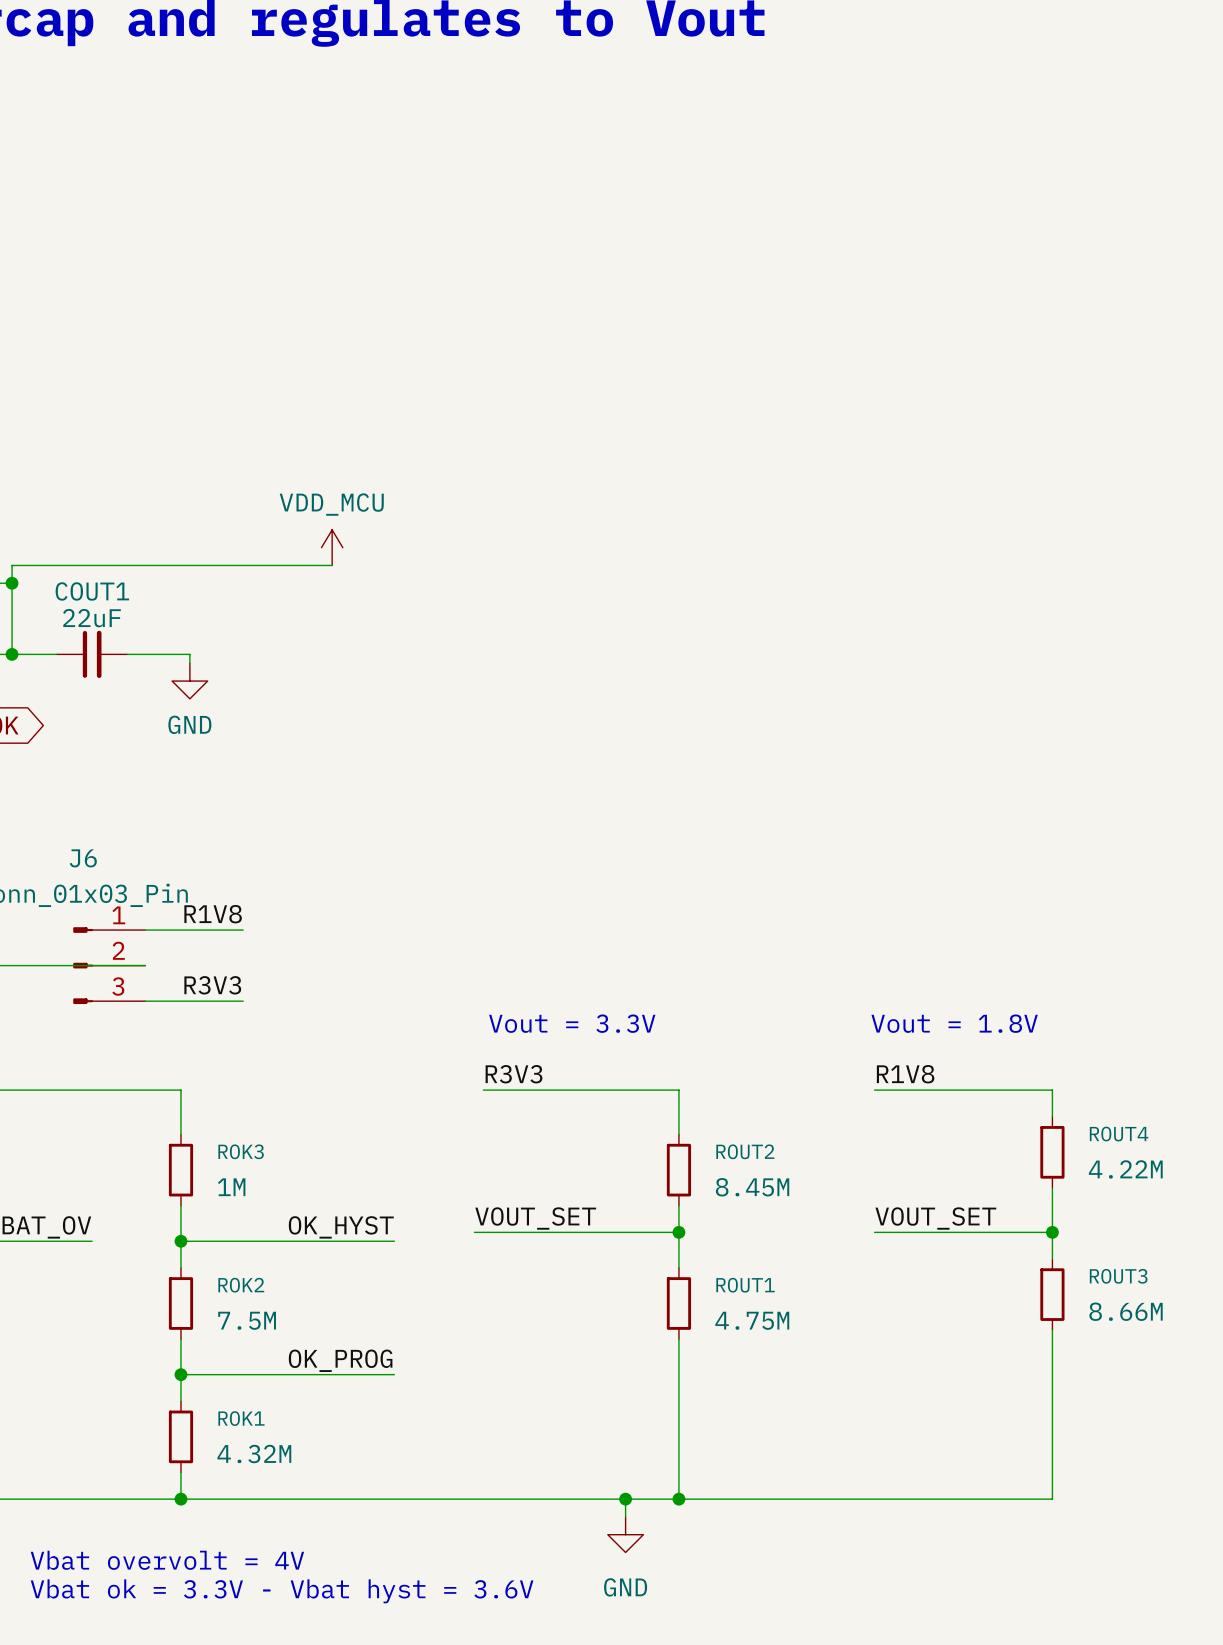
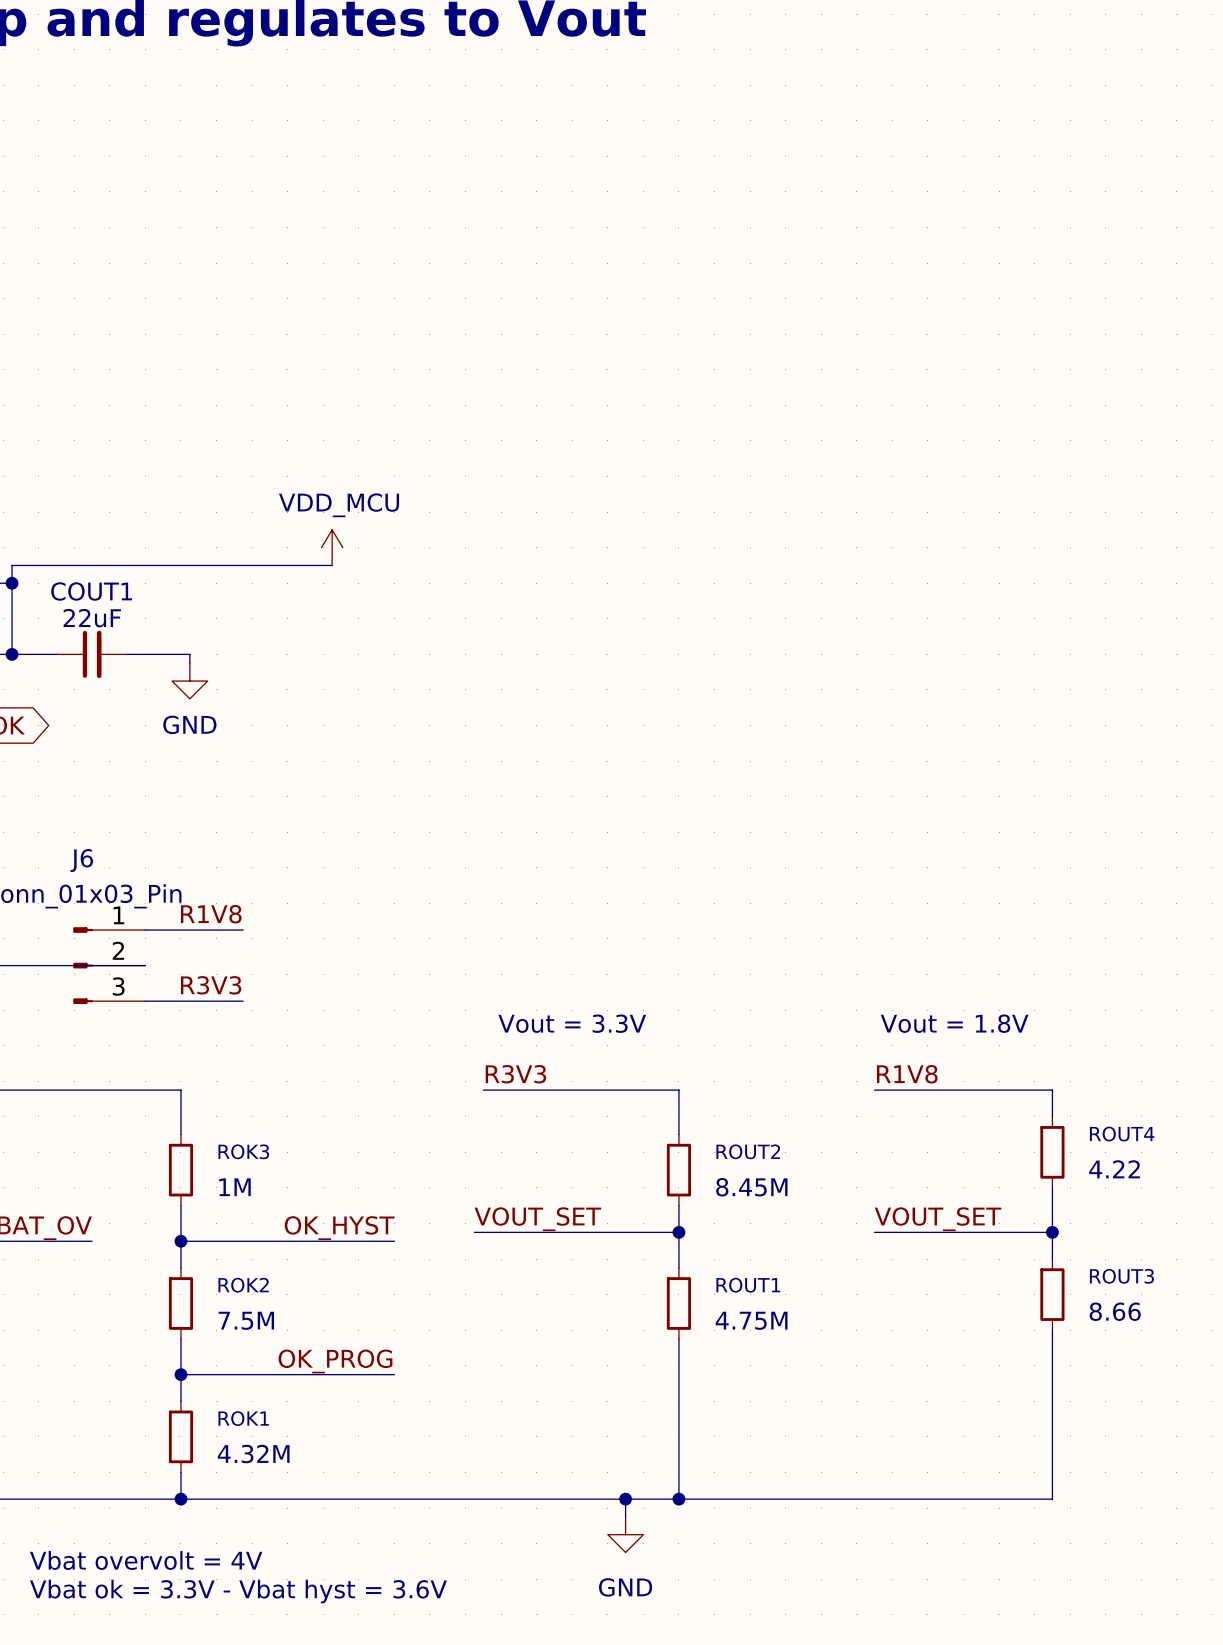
ROUT4 value: 4.22M (1125, 1169) -> 4.22 (1114, 1169)
ROUT3 value: 8.66M (1126, 1311) -> 8.66 (1115, 1311)

